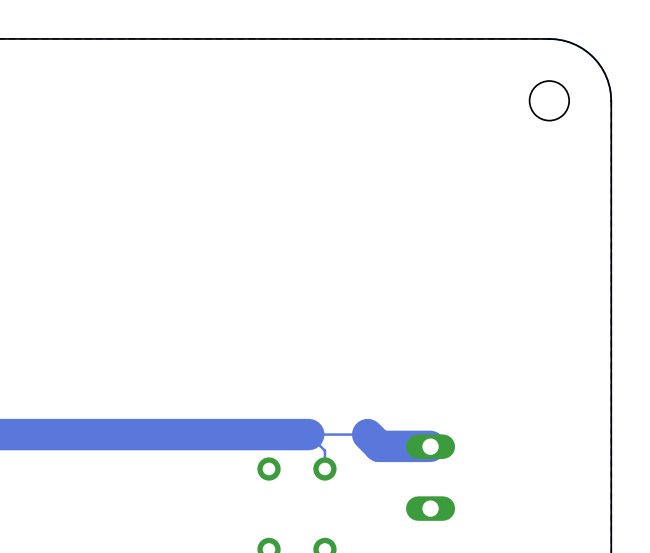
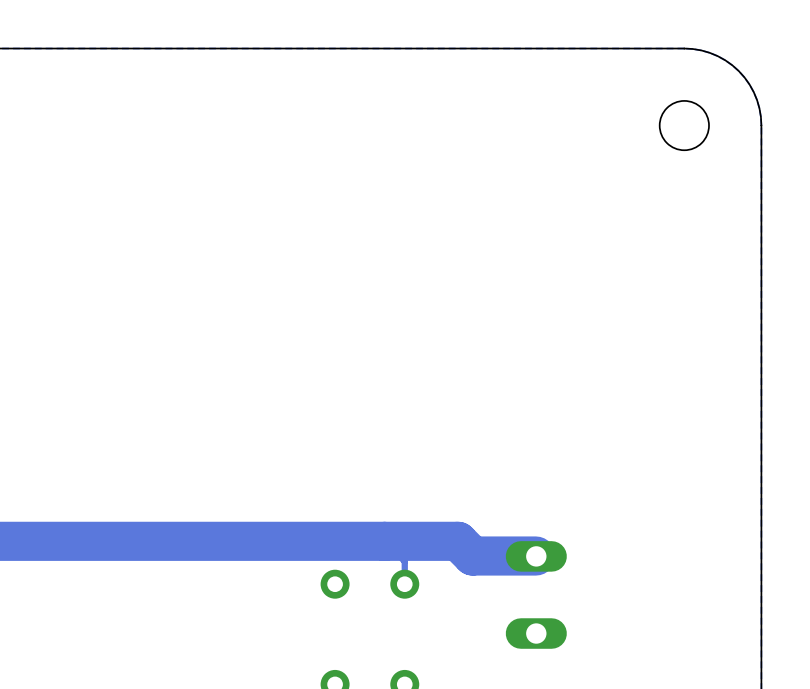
track width: thin (367, 434) (308, 434) (324, 450) (324, 468) -> thick (458, 541) (384, 541) (404, 561) (404, 584)

